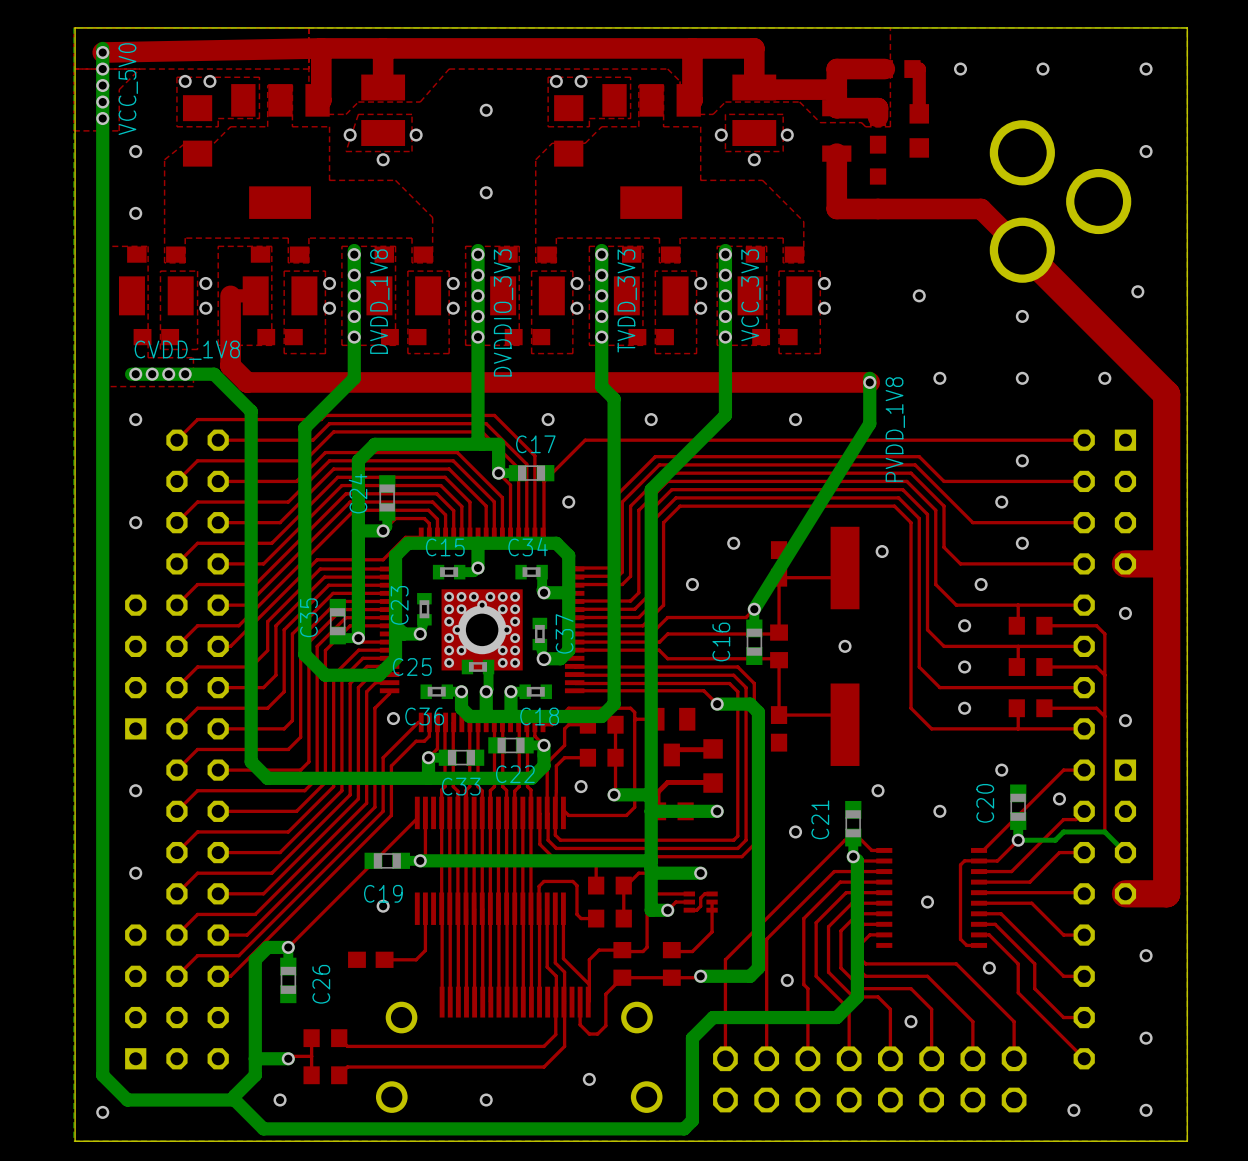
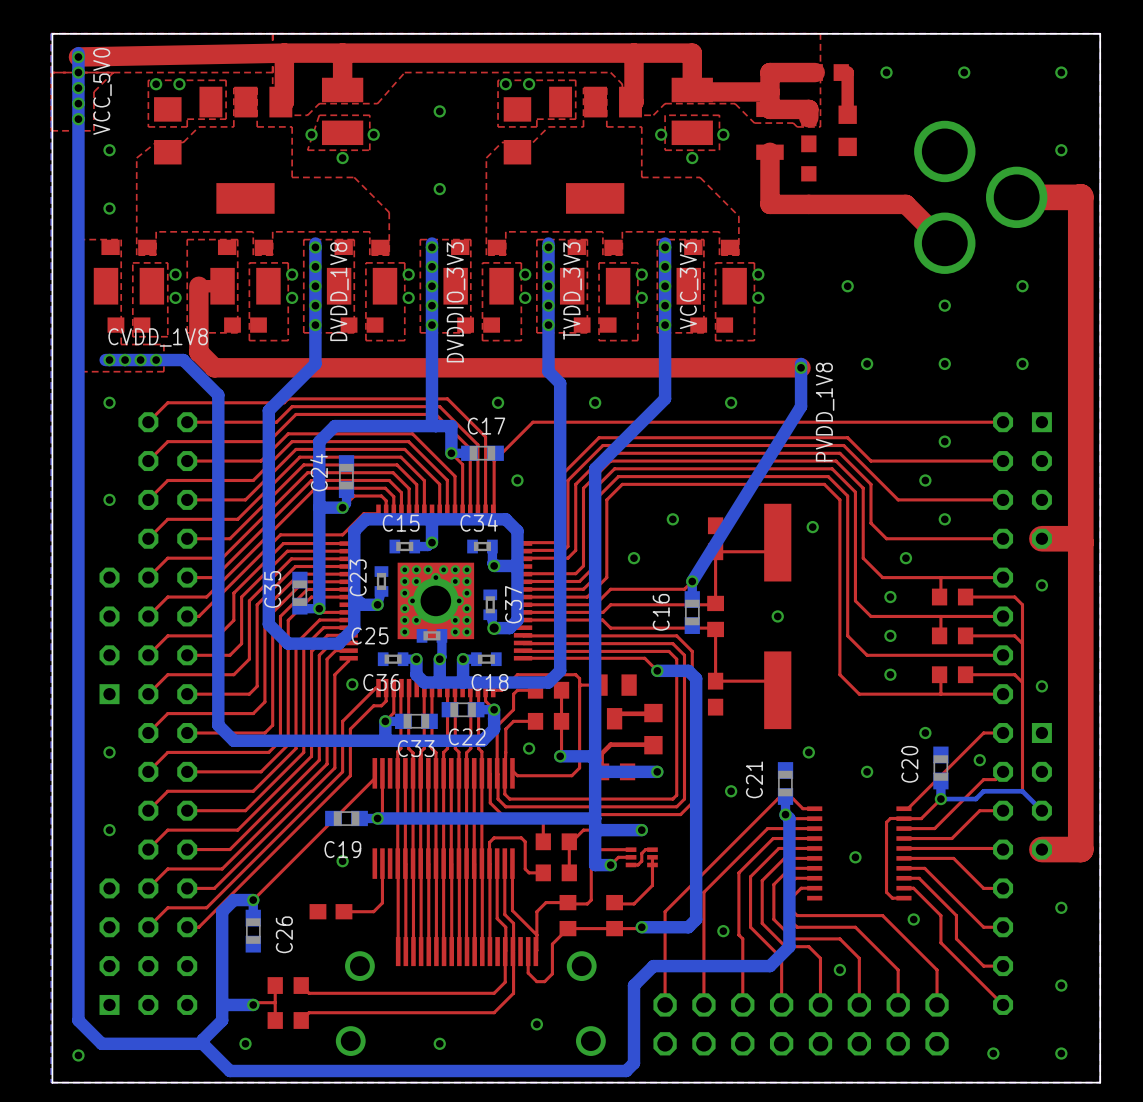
top track: (1022, 250) (1166, 394) -> (1016, 197) (1080, 196) (1080, 379)
via position: (1137, 291) -> (1022, 286)

